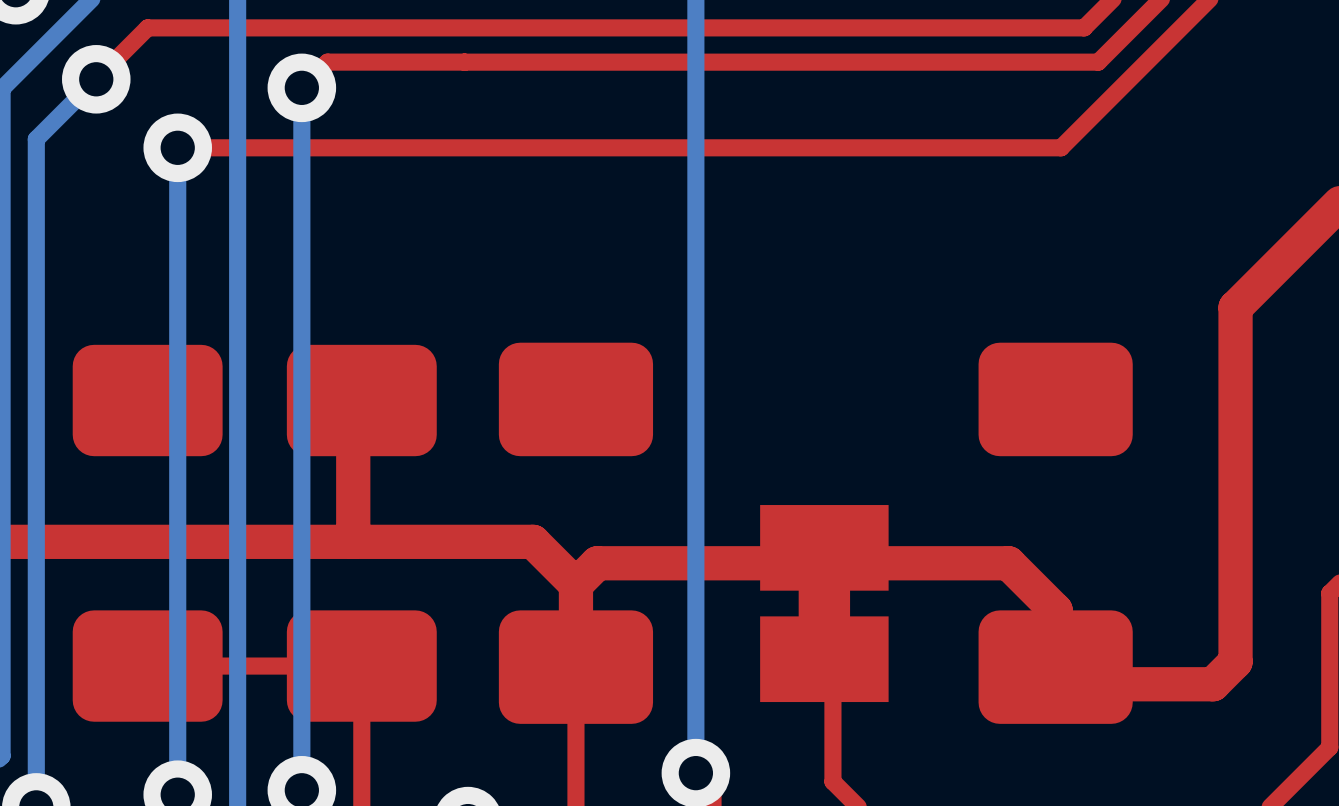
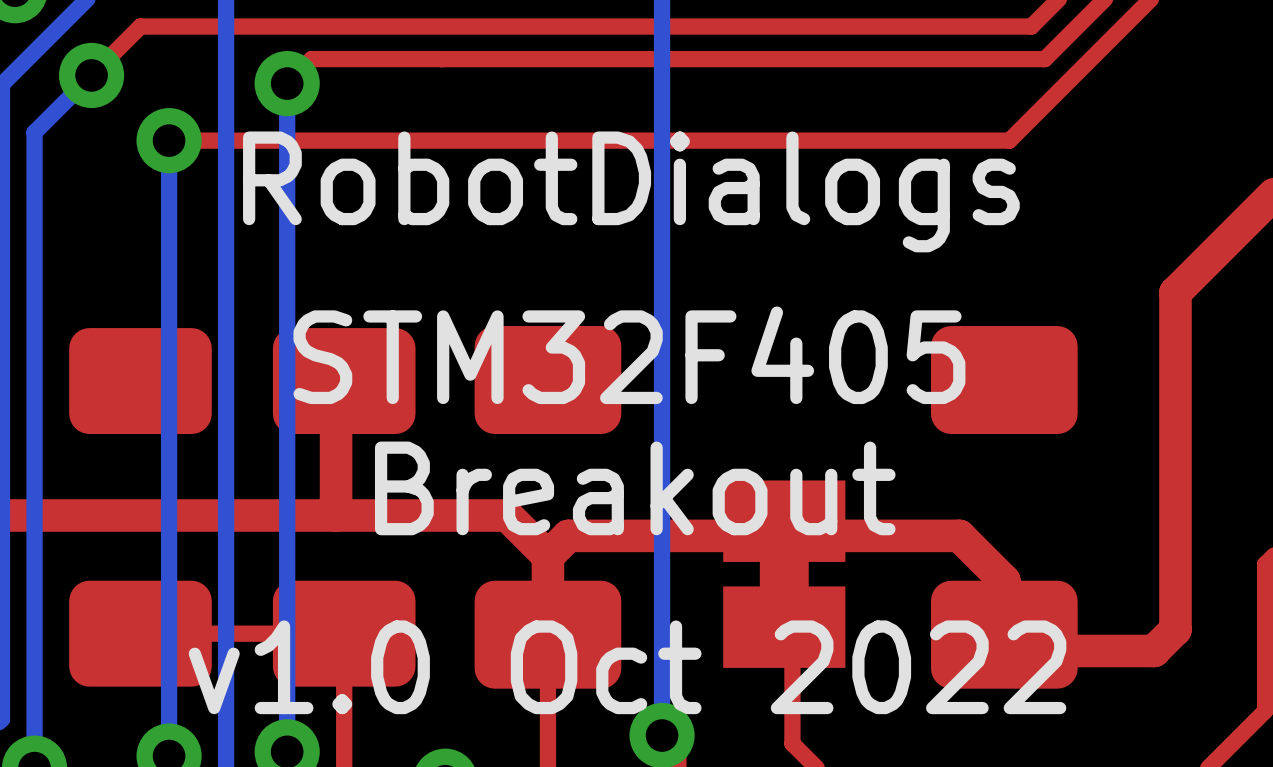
text: none -> RobotDialogs (631, 191)
text: none -> STM32F405 (629, 355)
text: none -> Breakout (635, 488)
text: none -> v1.0 Oct 2022 (627, 667)

